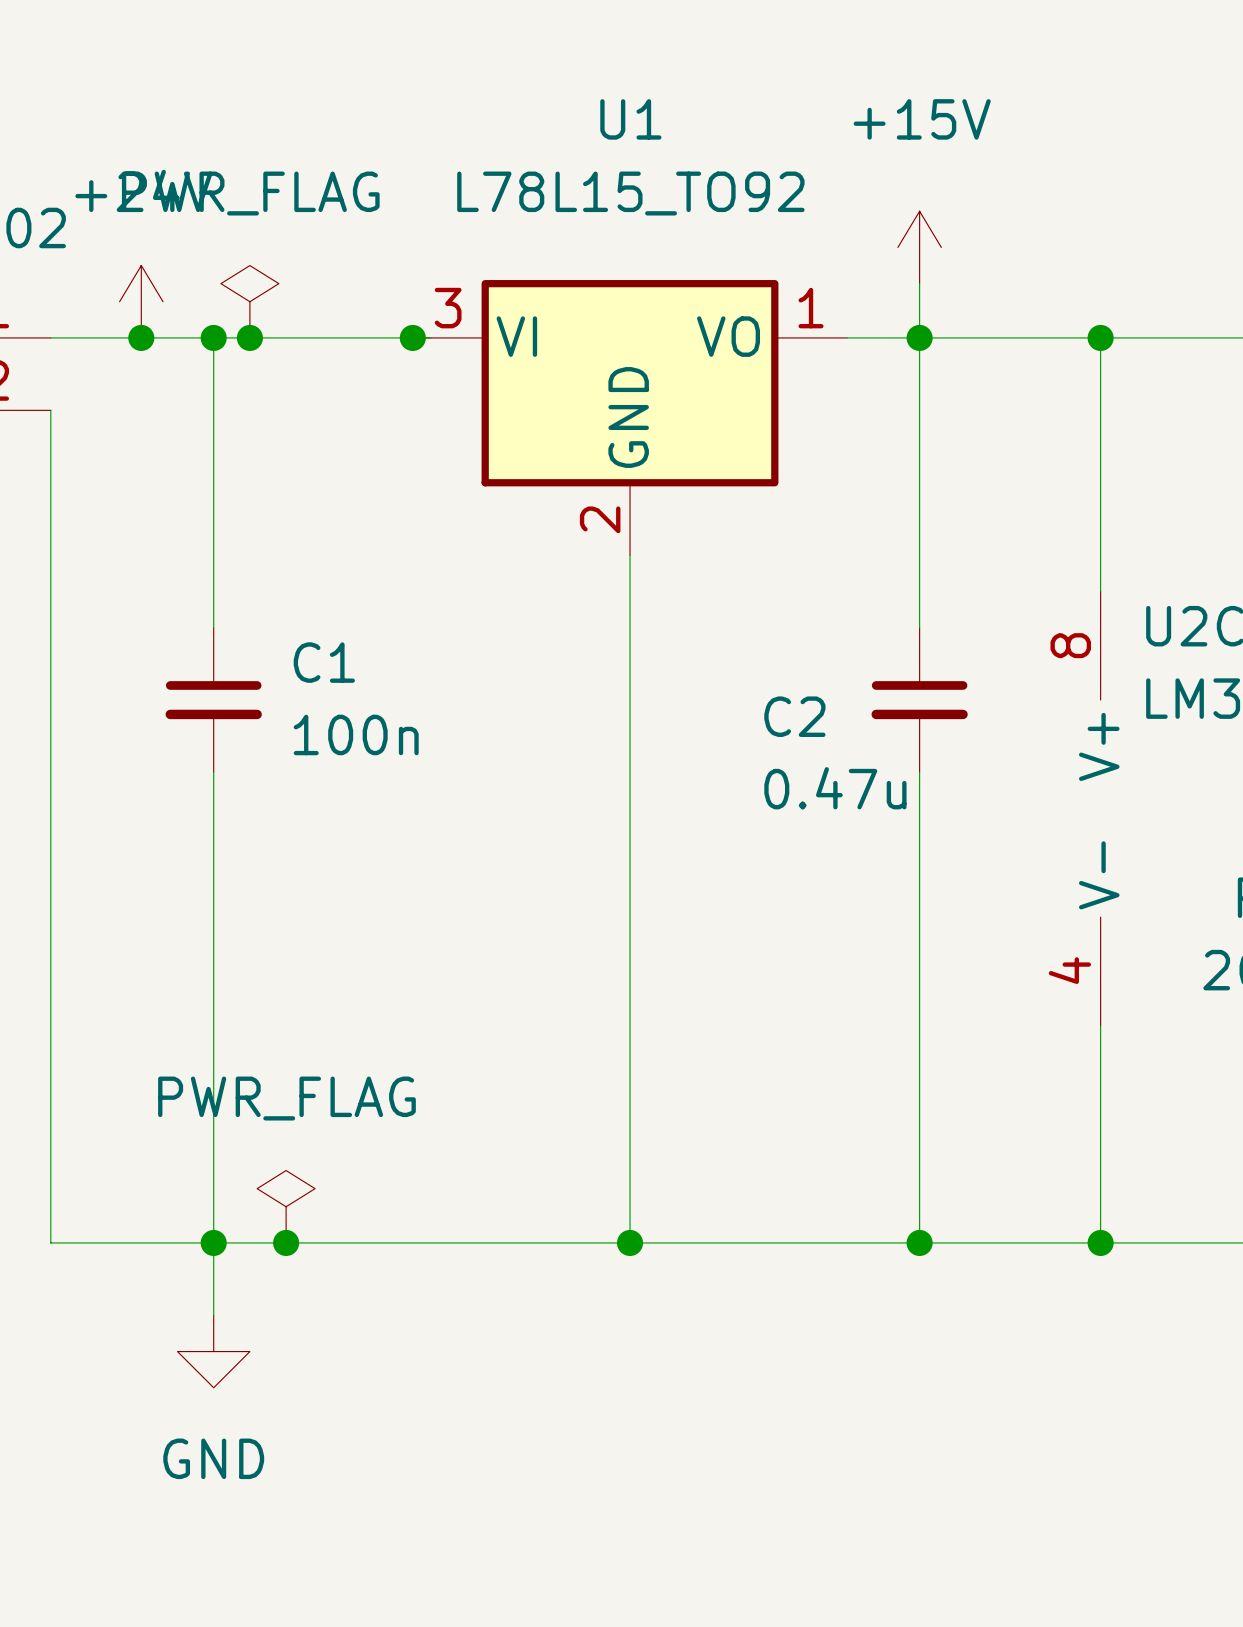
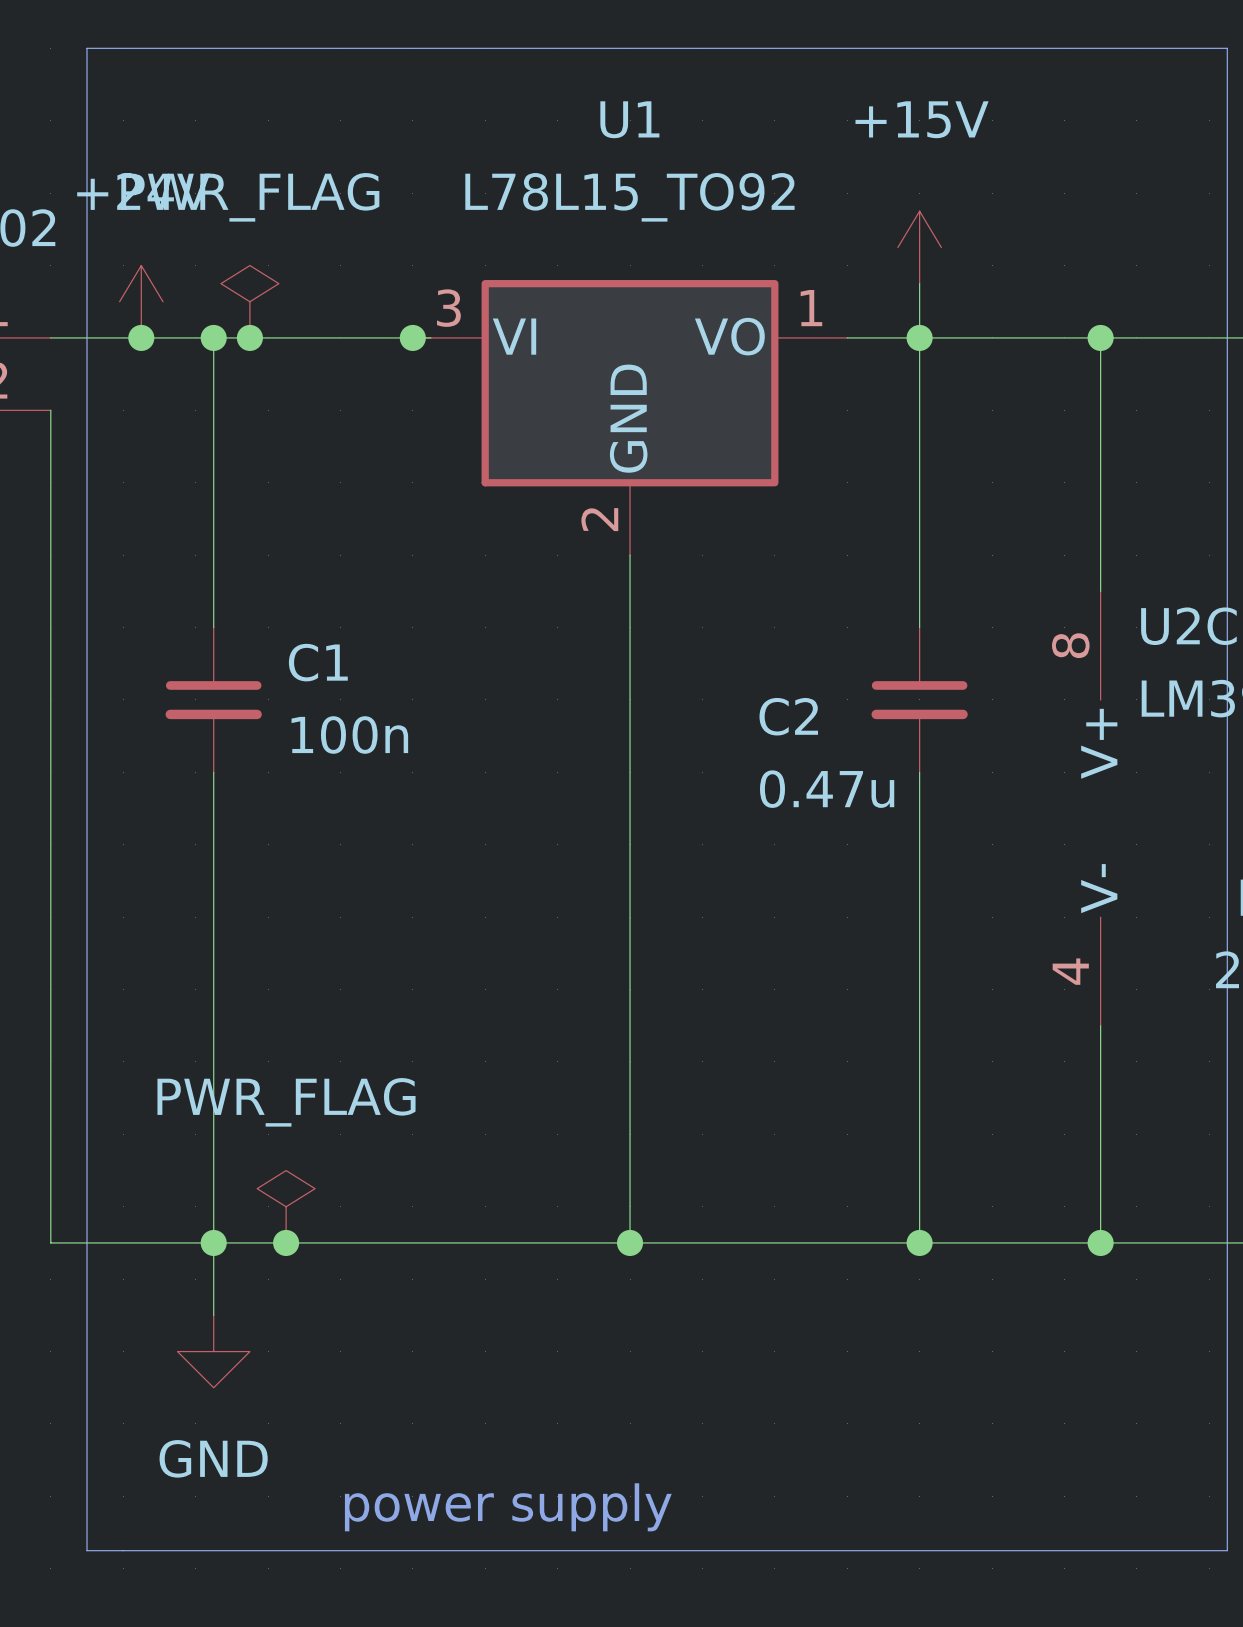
line: none -> (87, 48) (1227, 48) (1227, 1550) (87, 1550) (87, 48)
text: none -> power supply (508, 1507)

